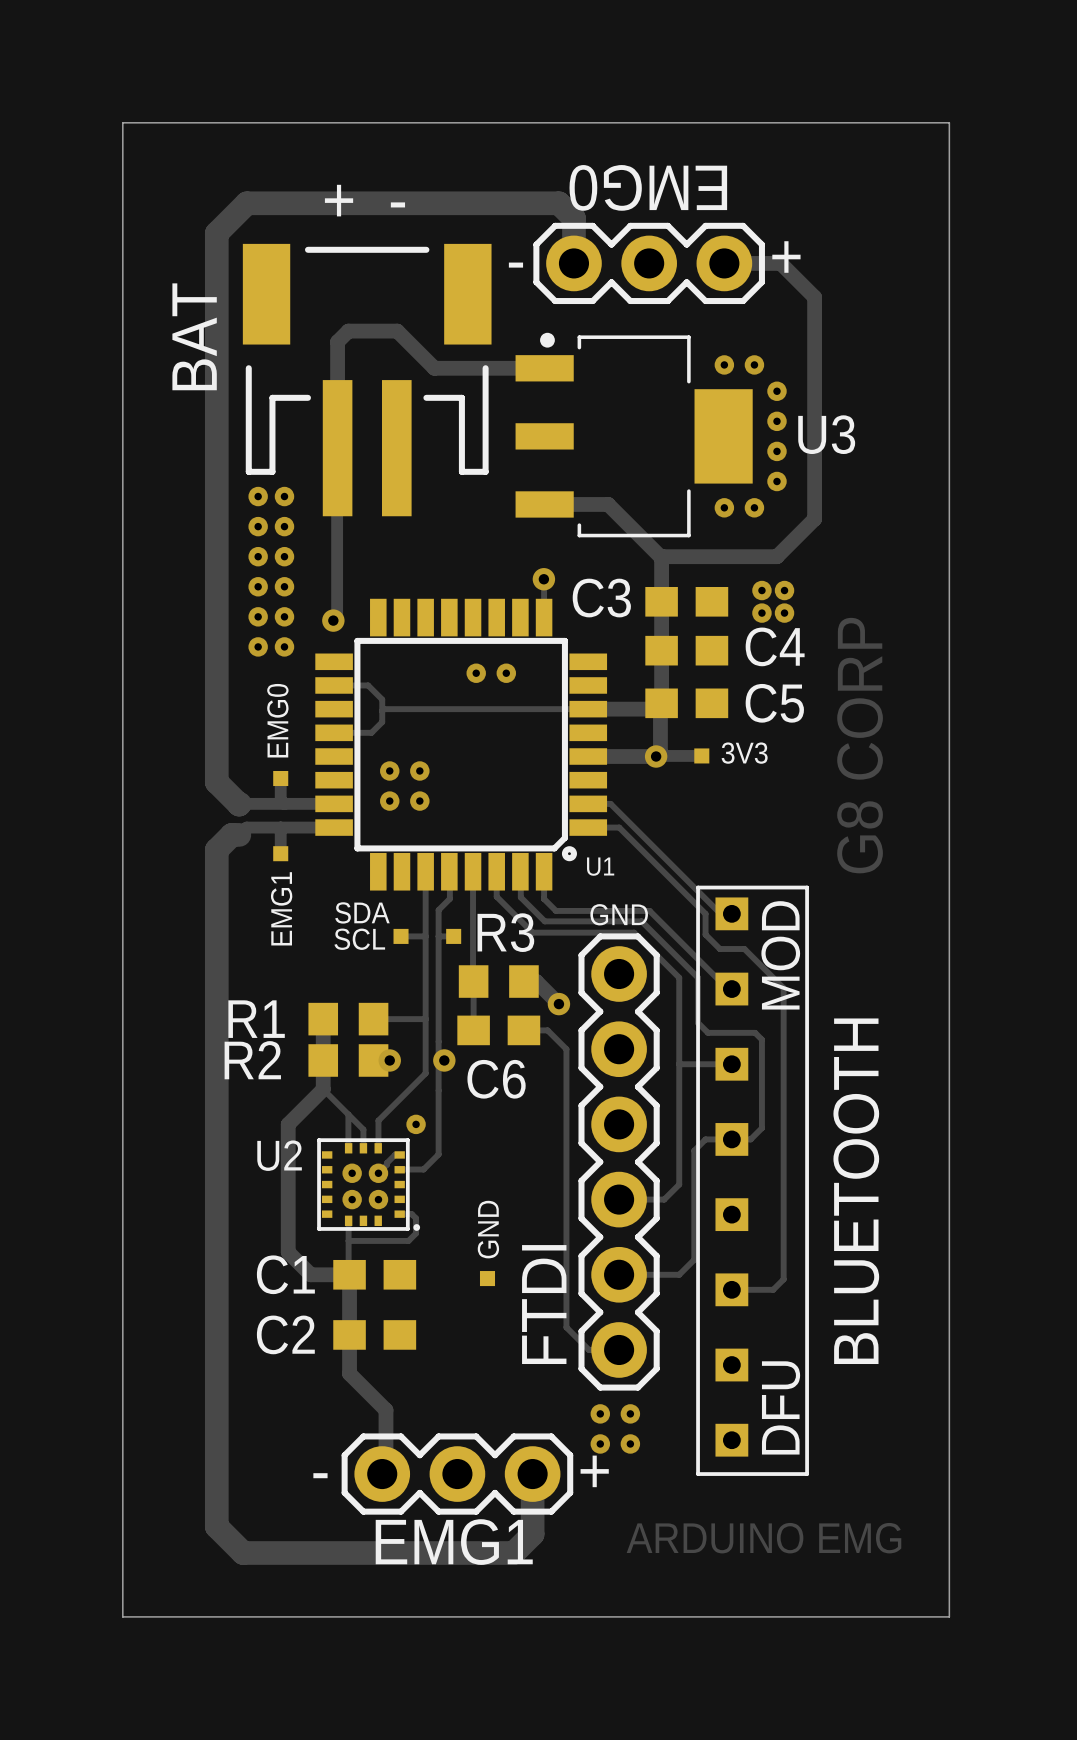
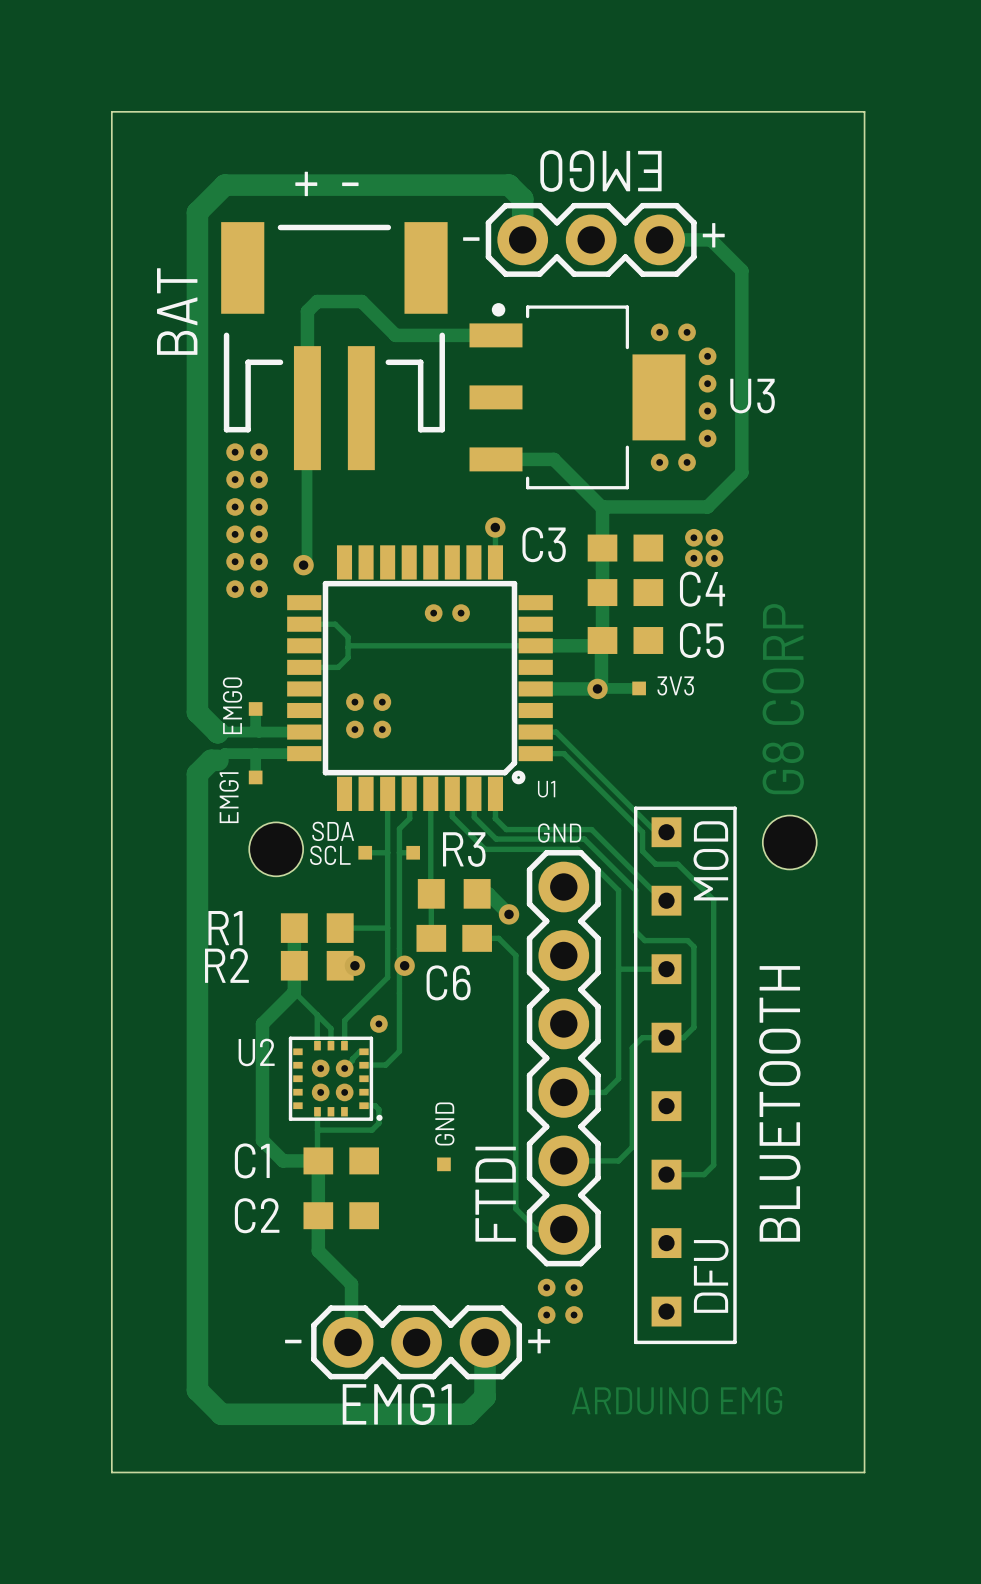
text position: EMG0 (277, 720) -> EMG0 (232, 705)
text position: EMG1 (281, 908) -> EMG1 (229, 797)
hole: none -> (789, 842)
hole: none -> (276, 849)

